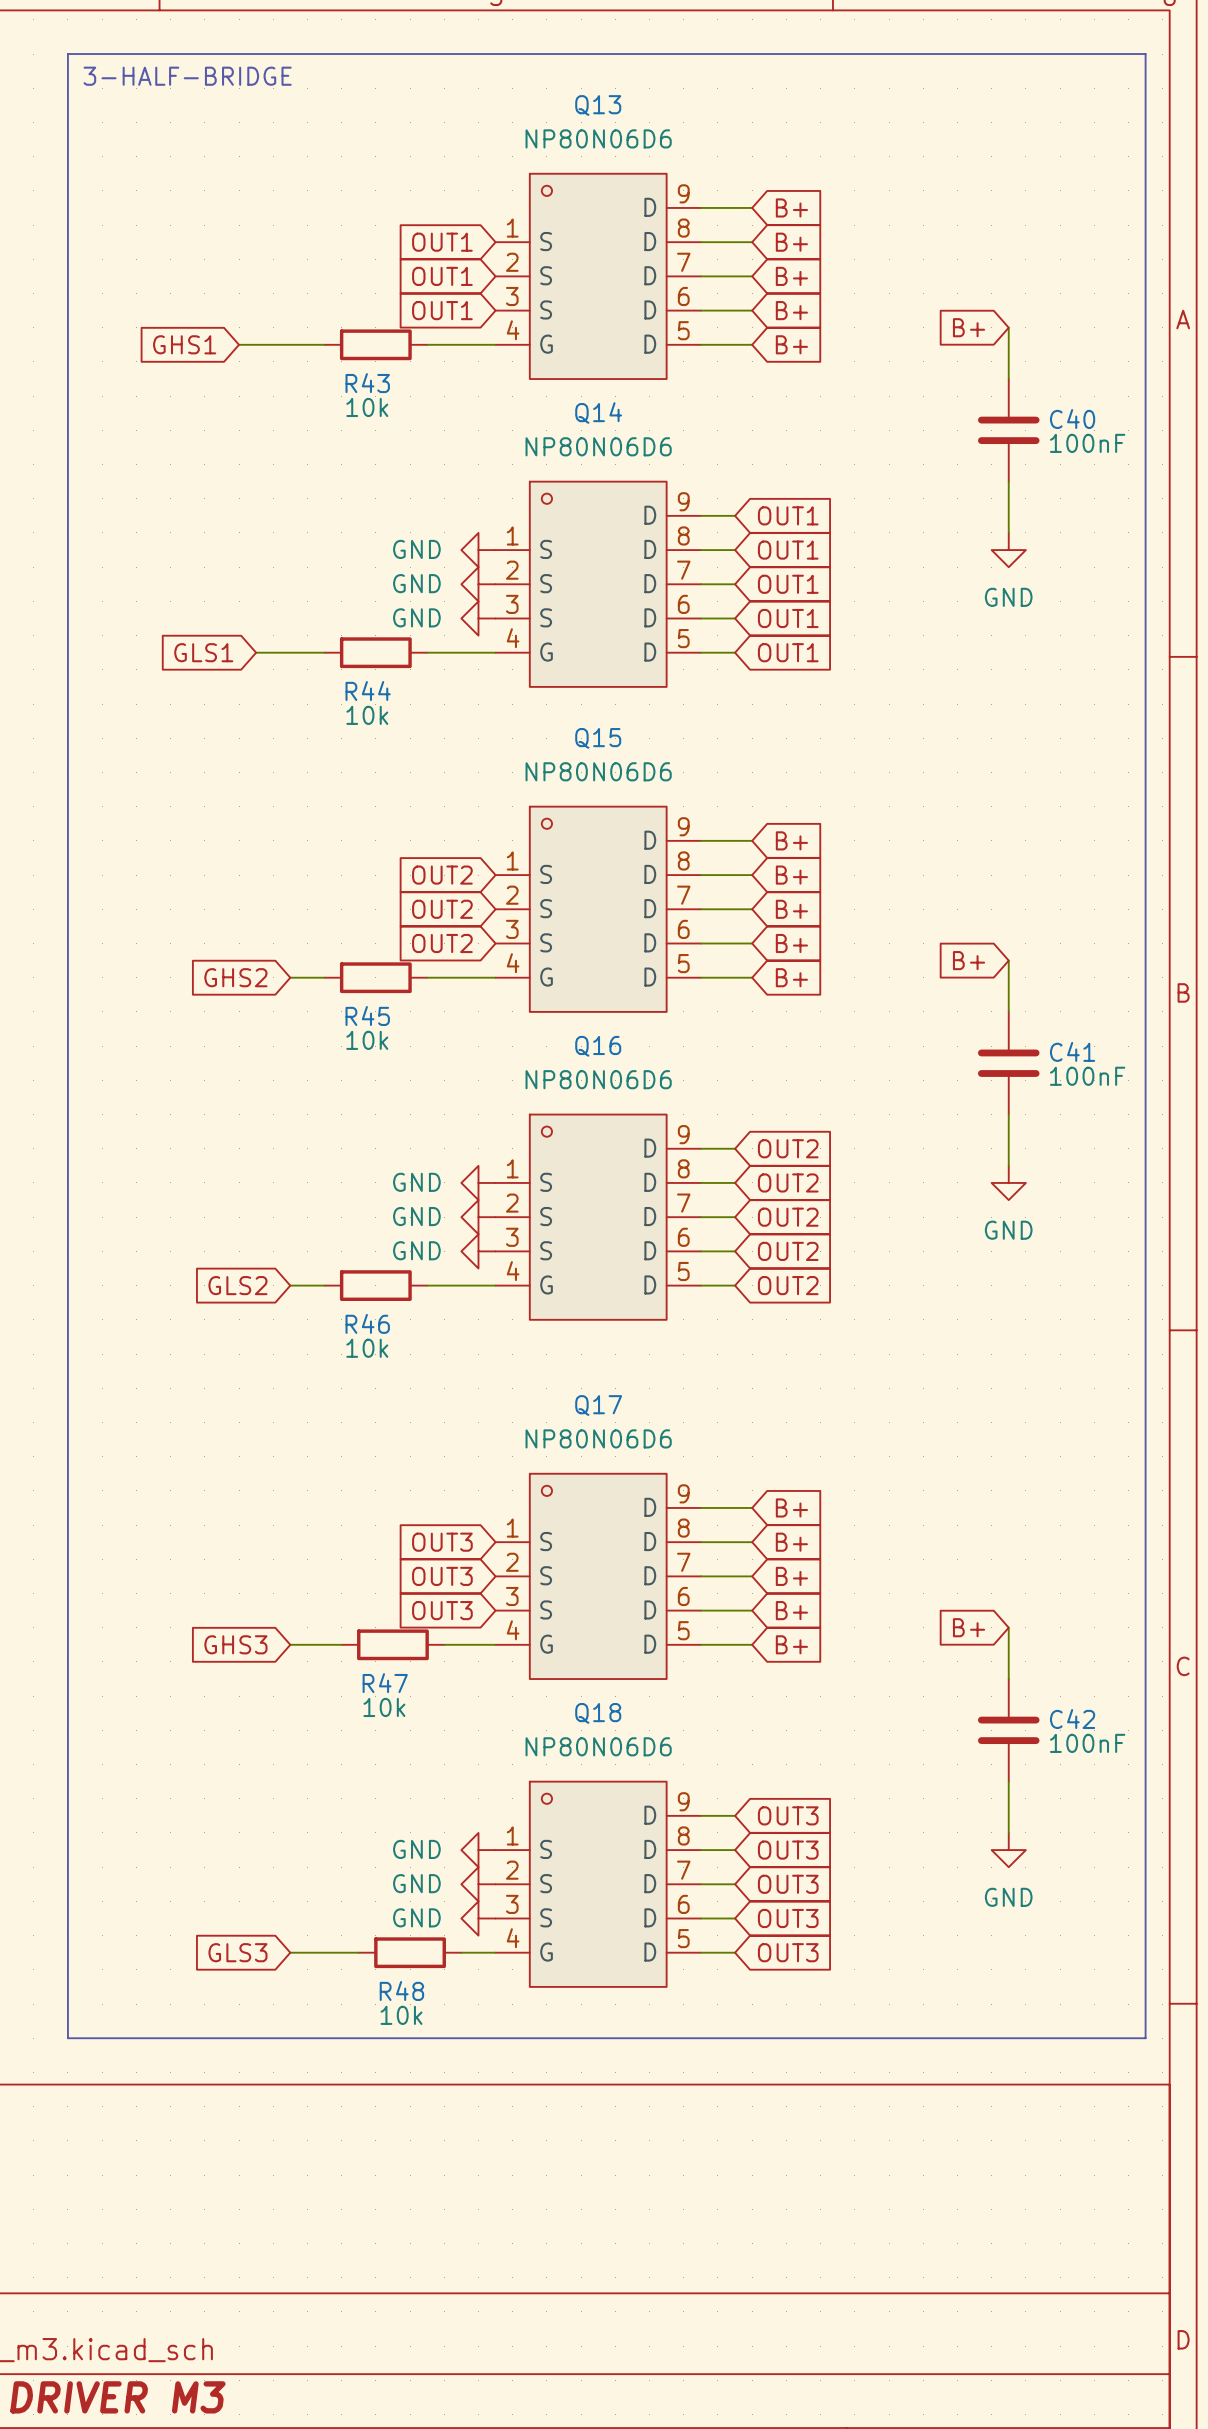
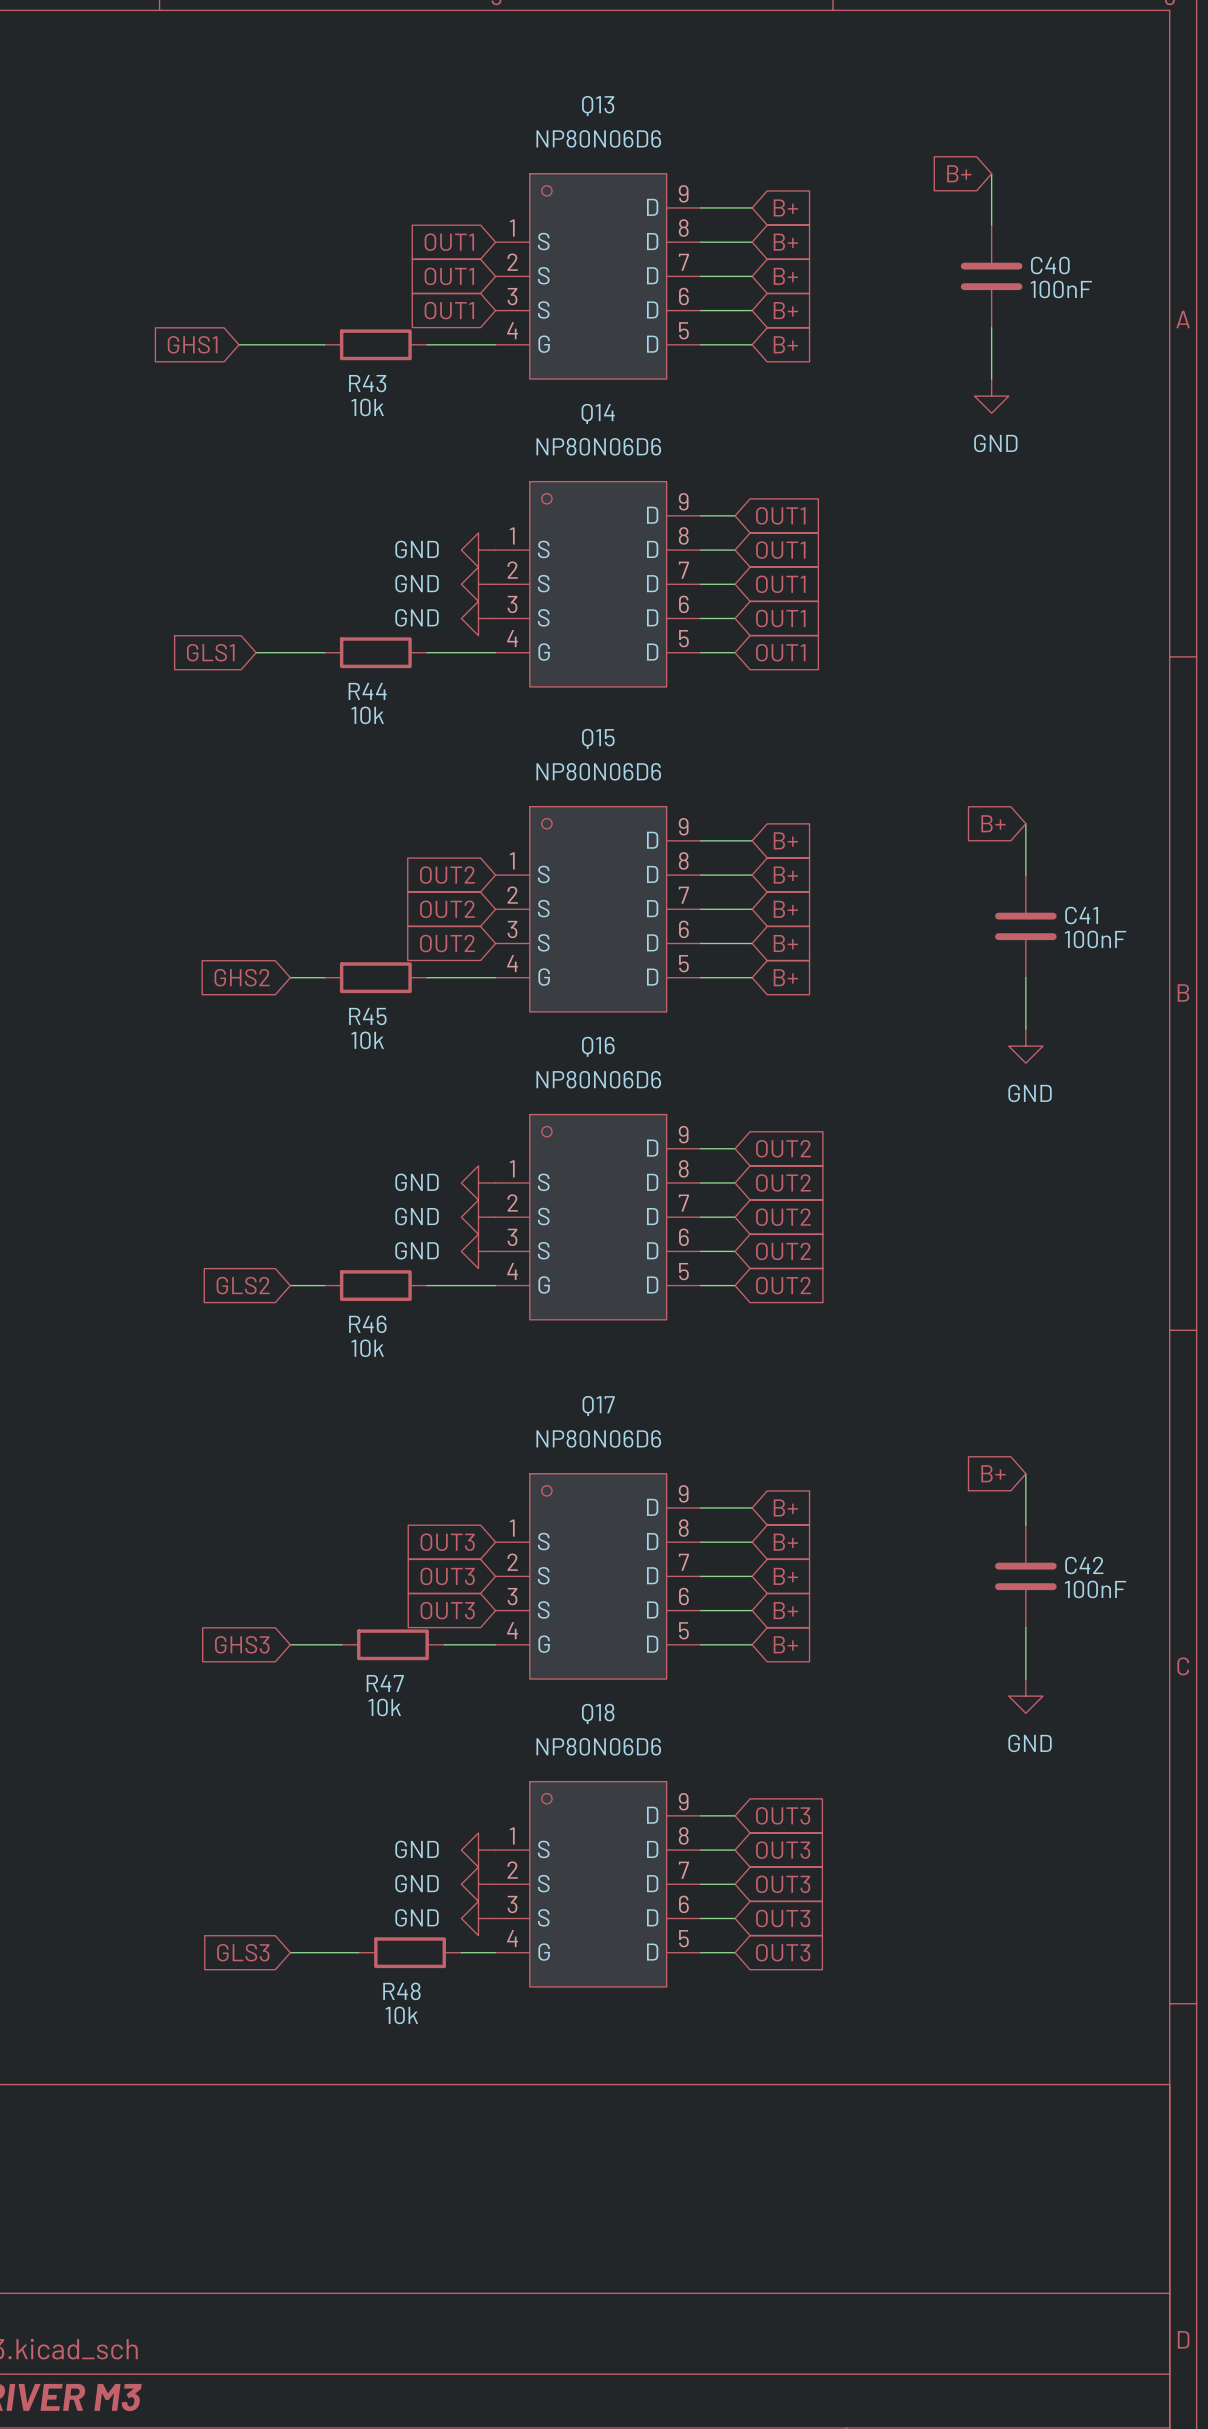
line: (67, 54) (1145, 54) (1145, 2038) (67, 2038) (67, 54) -> none
text: 3-HALF-BRIDGE (187, 76) -> none
global label position: B+ (969, 327) -> B+ (959, 173)
wire: (1008, 327) (1008, 379) -> (991, 173) (991, 225)
C40 position: (1008, 430) -> (991, 276)
wire: (1008, 481) (1008, 532) -> (991, 327) (991, 379)
power symbol position: GND (1008, 550) -> GND (991, 396)
global label position: B+ (969, 960) -> B+ (993, 823)
wire: (1008, 960) (1008, 1011) -> (1025, 823) (1025, 875)
C41 position: (1008, 1063) -> (1025, 926)
wire: (1008, 1114) (1008, 1165) -> (1025, 977) (1025, 1029)
power symbol position: GND (1008, 1182) -> GND (1025, 1046)
global label position: B+ (969, 1627) -> B+ (993, 1473)
wire: (1008, 1627) (1008, 1679) -> (1025, 1473) (1025, 1525)
C42 position: (1008, 1730) -> (1025, 1576)
wire: (1008, 1781) (1008, 1832) -> (1025, 1627) (1025, 1679)
power symbol position: GND (1008, 1850) -> GND (1025, 1696)

